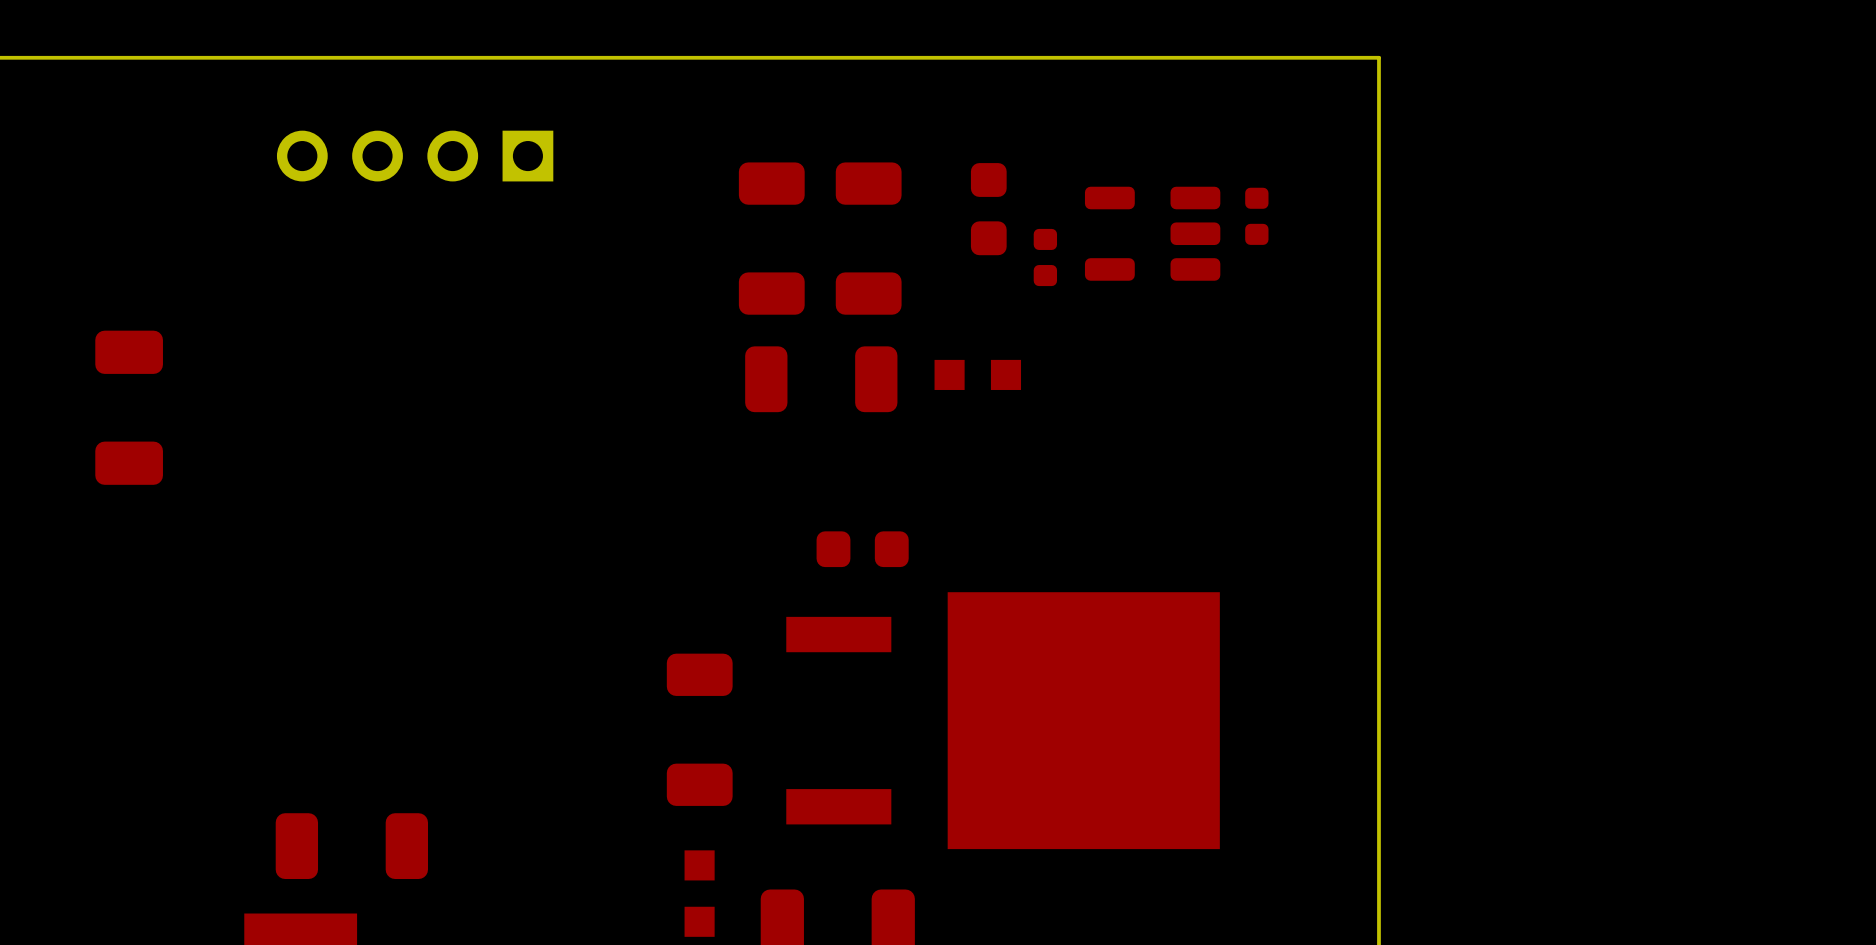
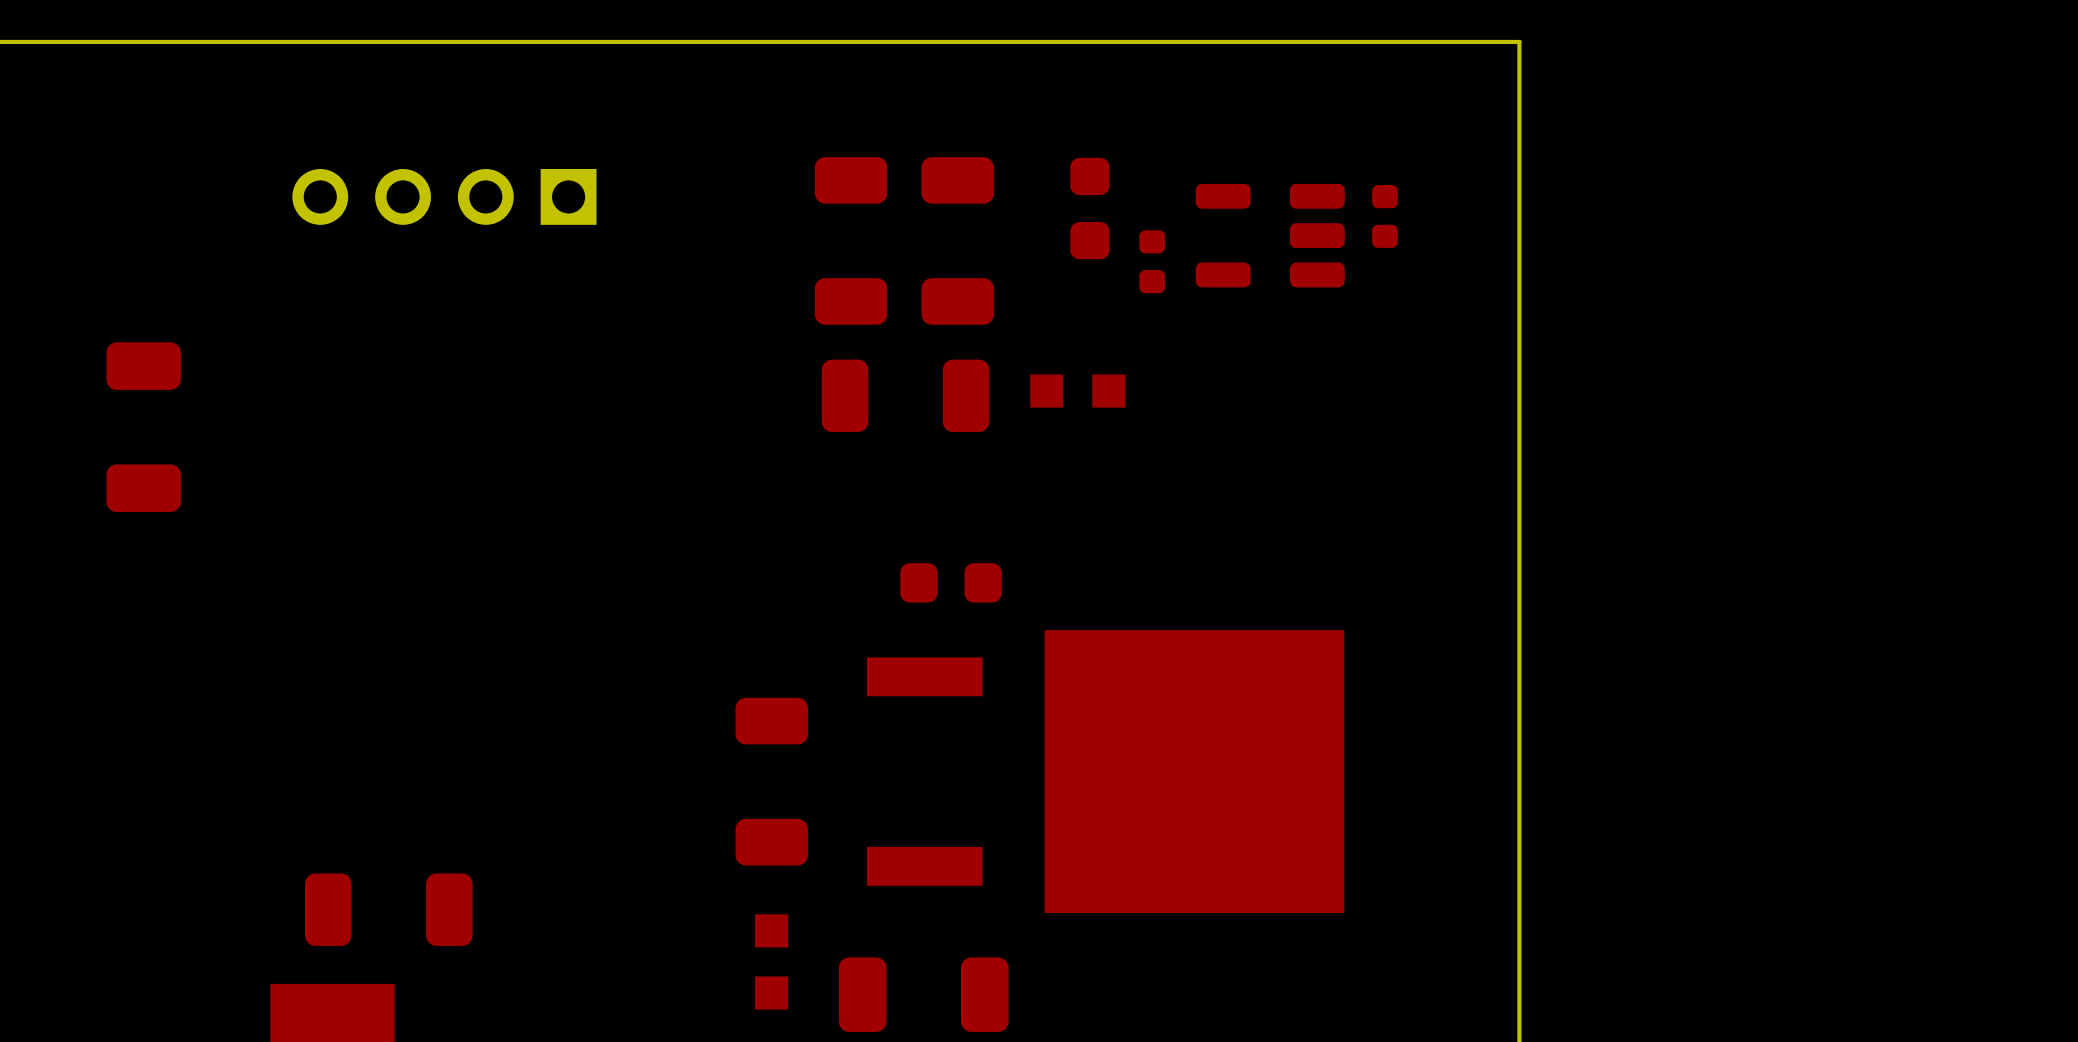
part position: (415, 156) -> (444, 196)

